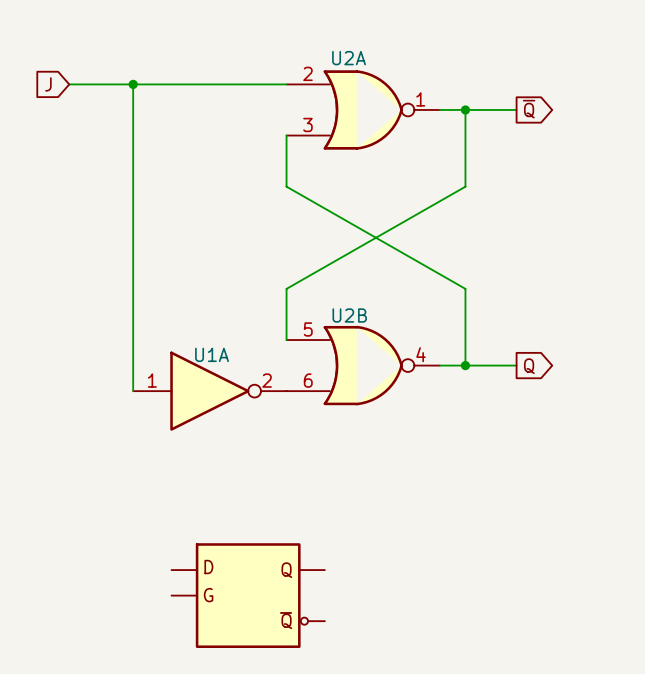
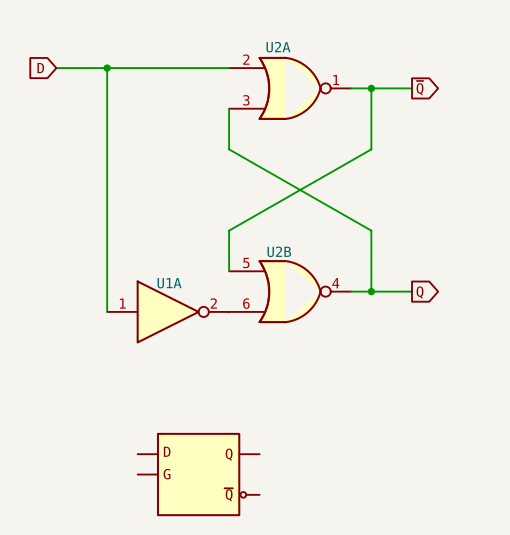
global label: J (48, 84) -> D (40, 68)

